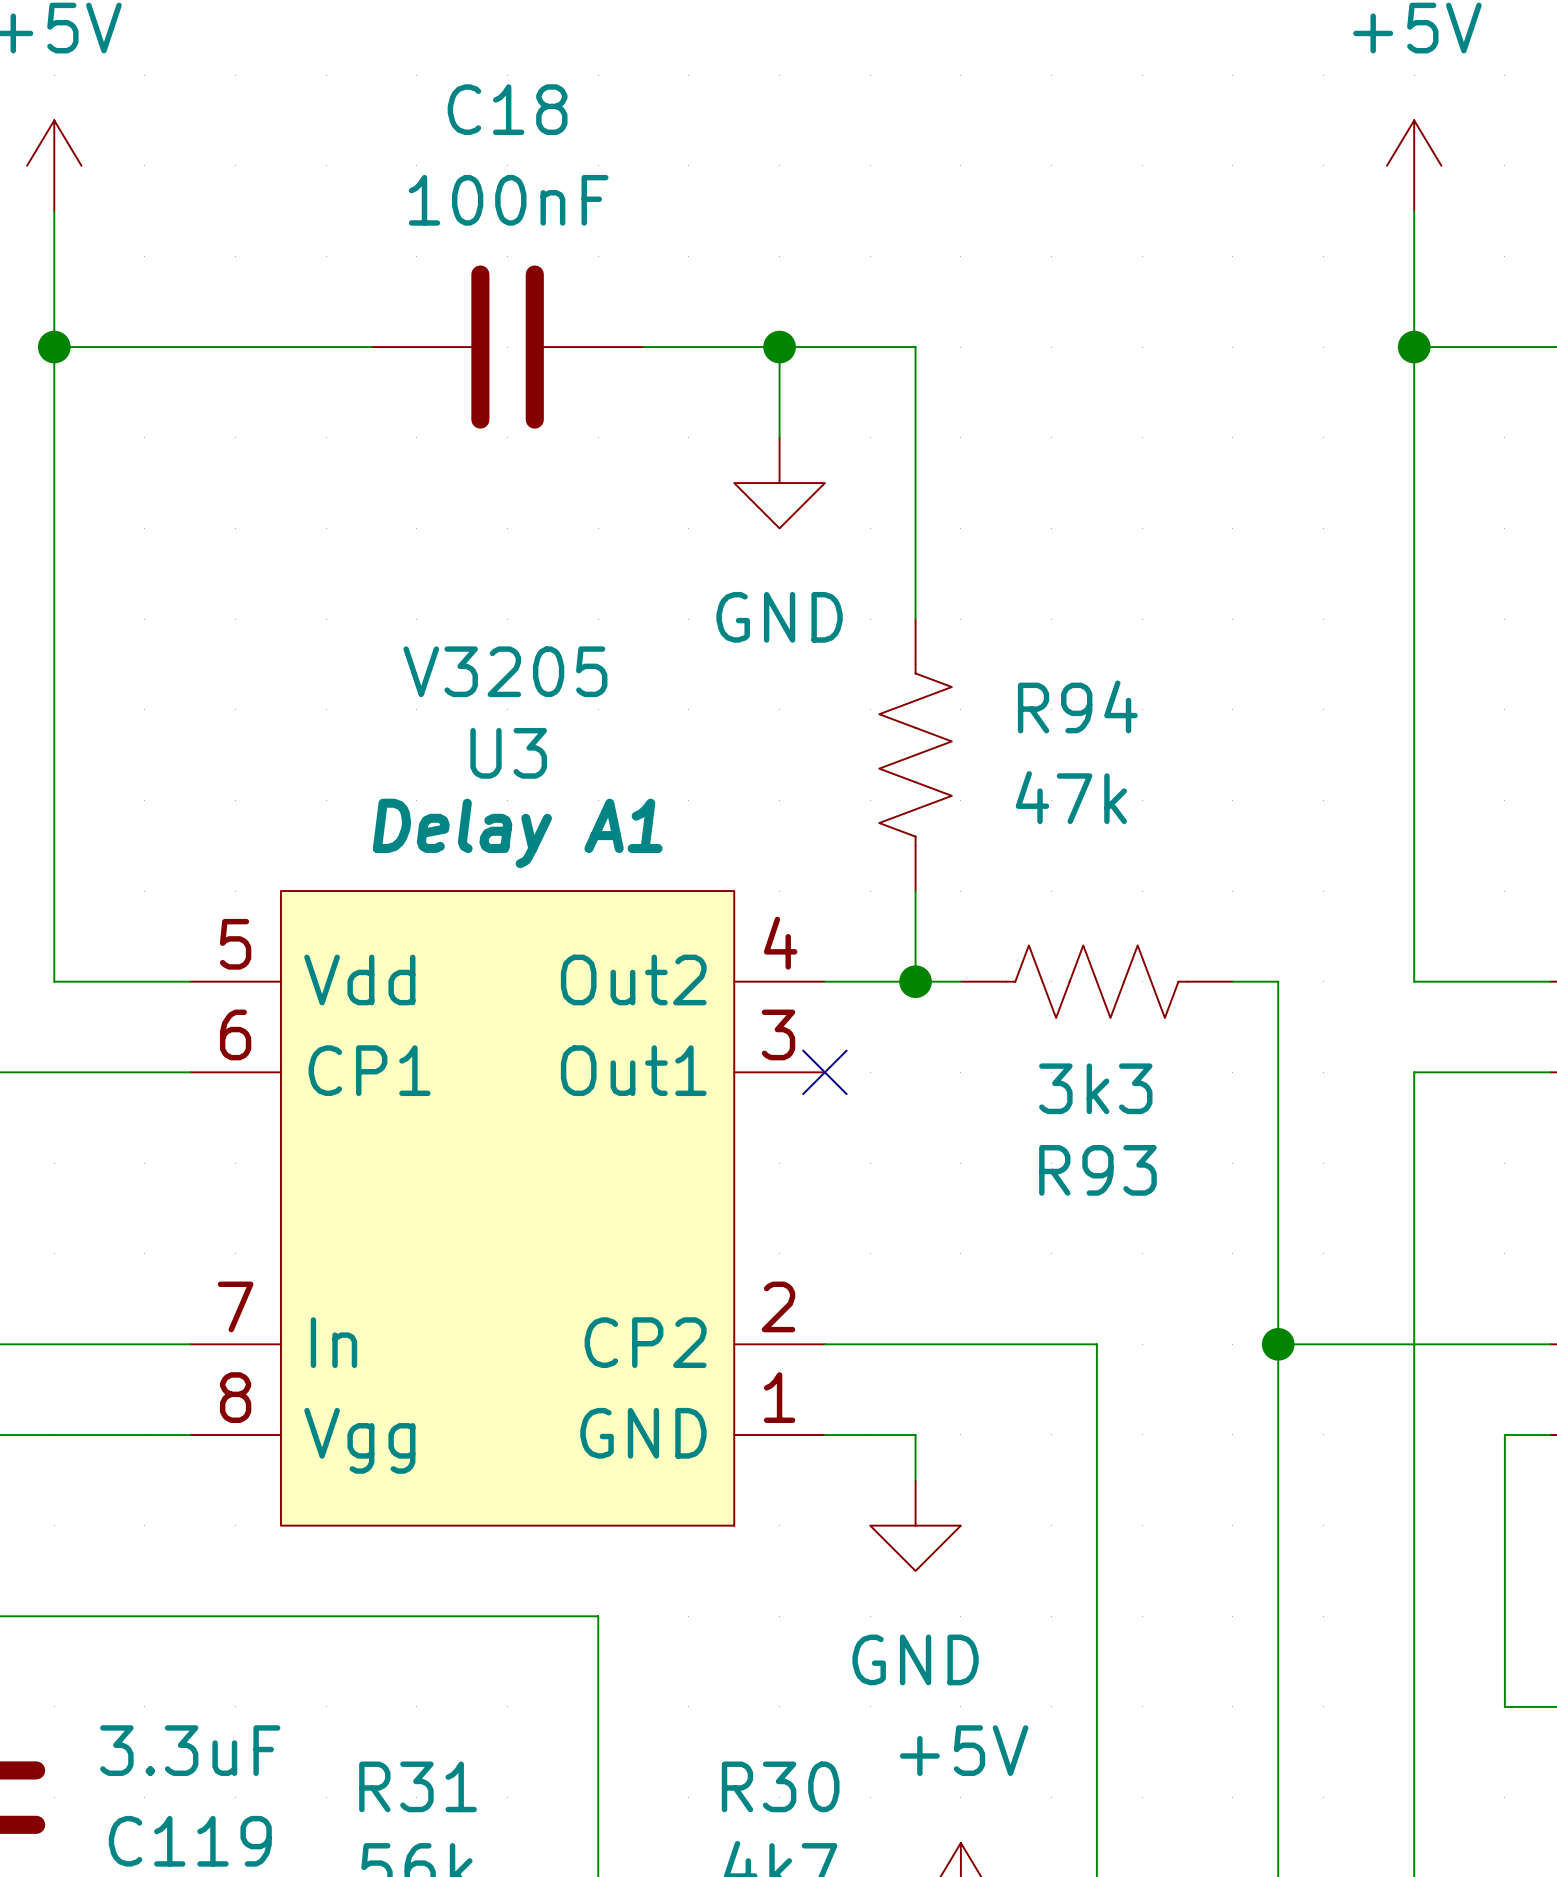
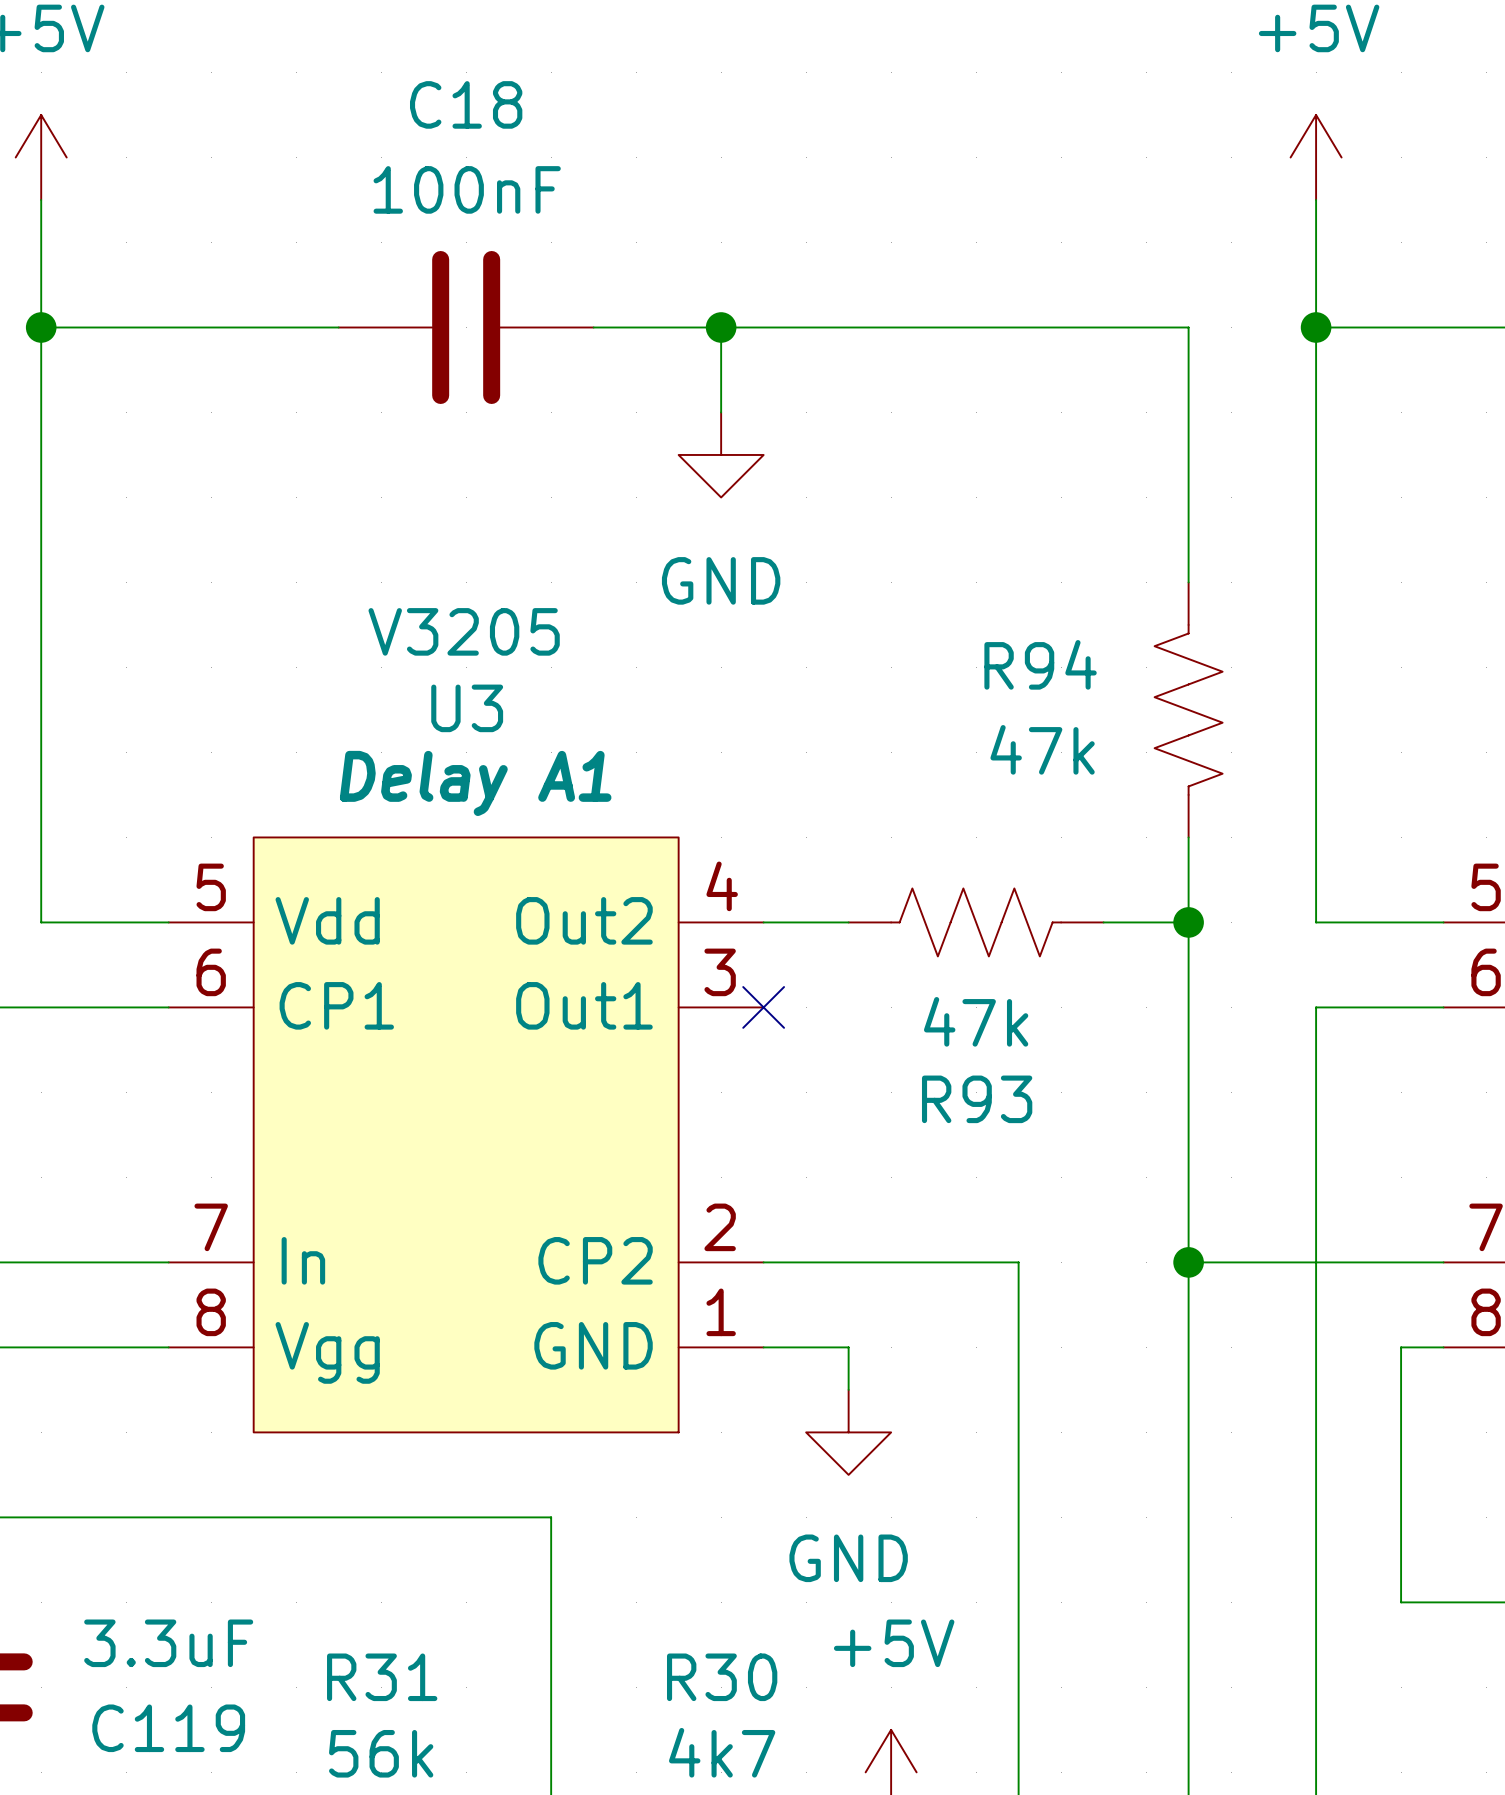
wire: (915, 347) (915, 619) -> (848, 327) (1188, 327) (1188, 582)
R94 flip: as is (915, 755) -> left-right (1188, 709)
R94 position: (915, 755) -> (1188, 709)
wire: (915, 891) (915, 981) (960, 981) -> none
wire: none -> (1188, 837) (1188, 922)
junction: (915, 981) -> none
R93 position: (1096, 981) -> (976, 922)
junction: none -> (1188, 922)
R93 value: 3k3 (1095, 1088) -> 47k (976, 1021)

